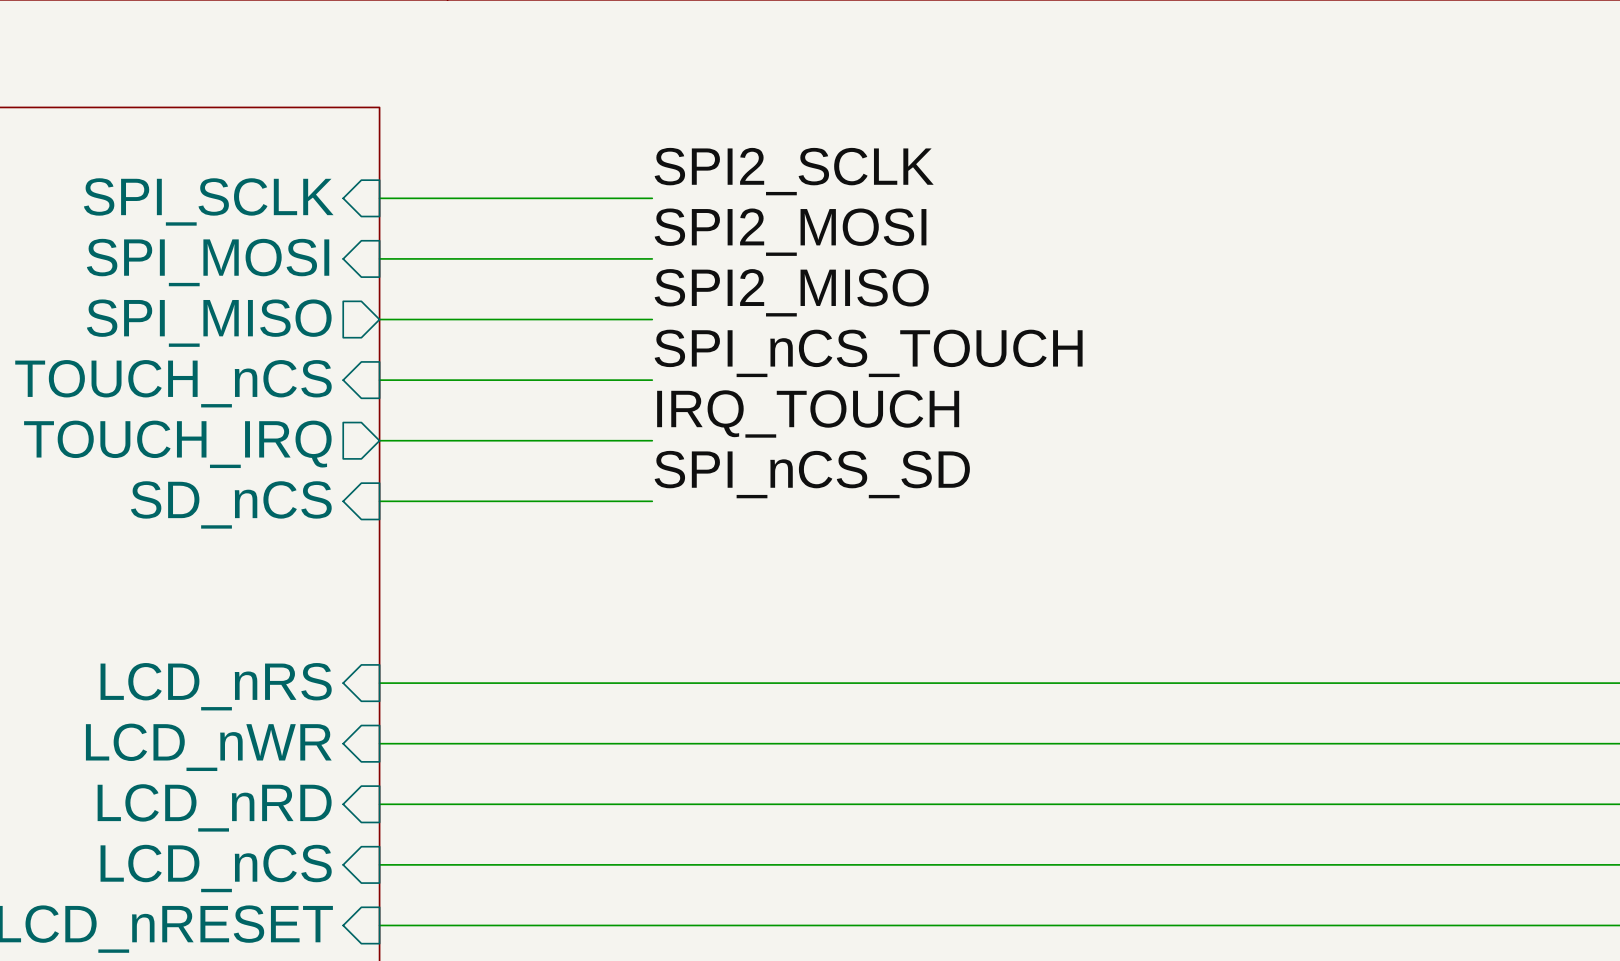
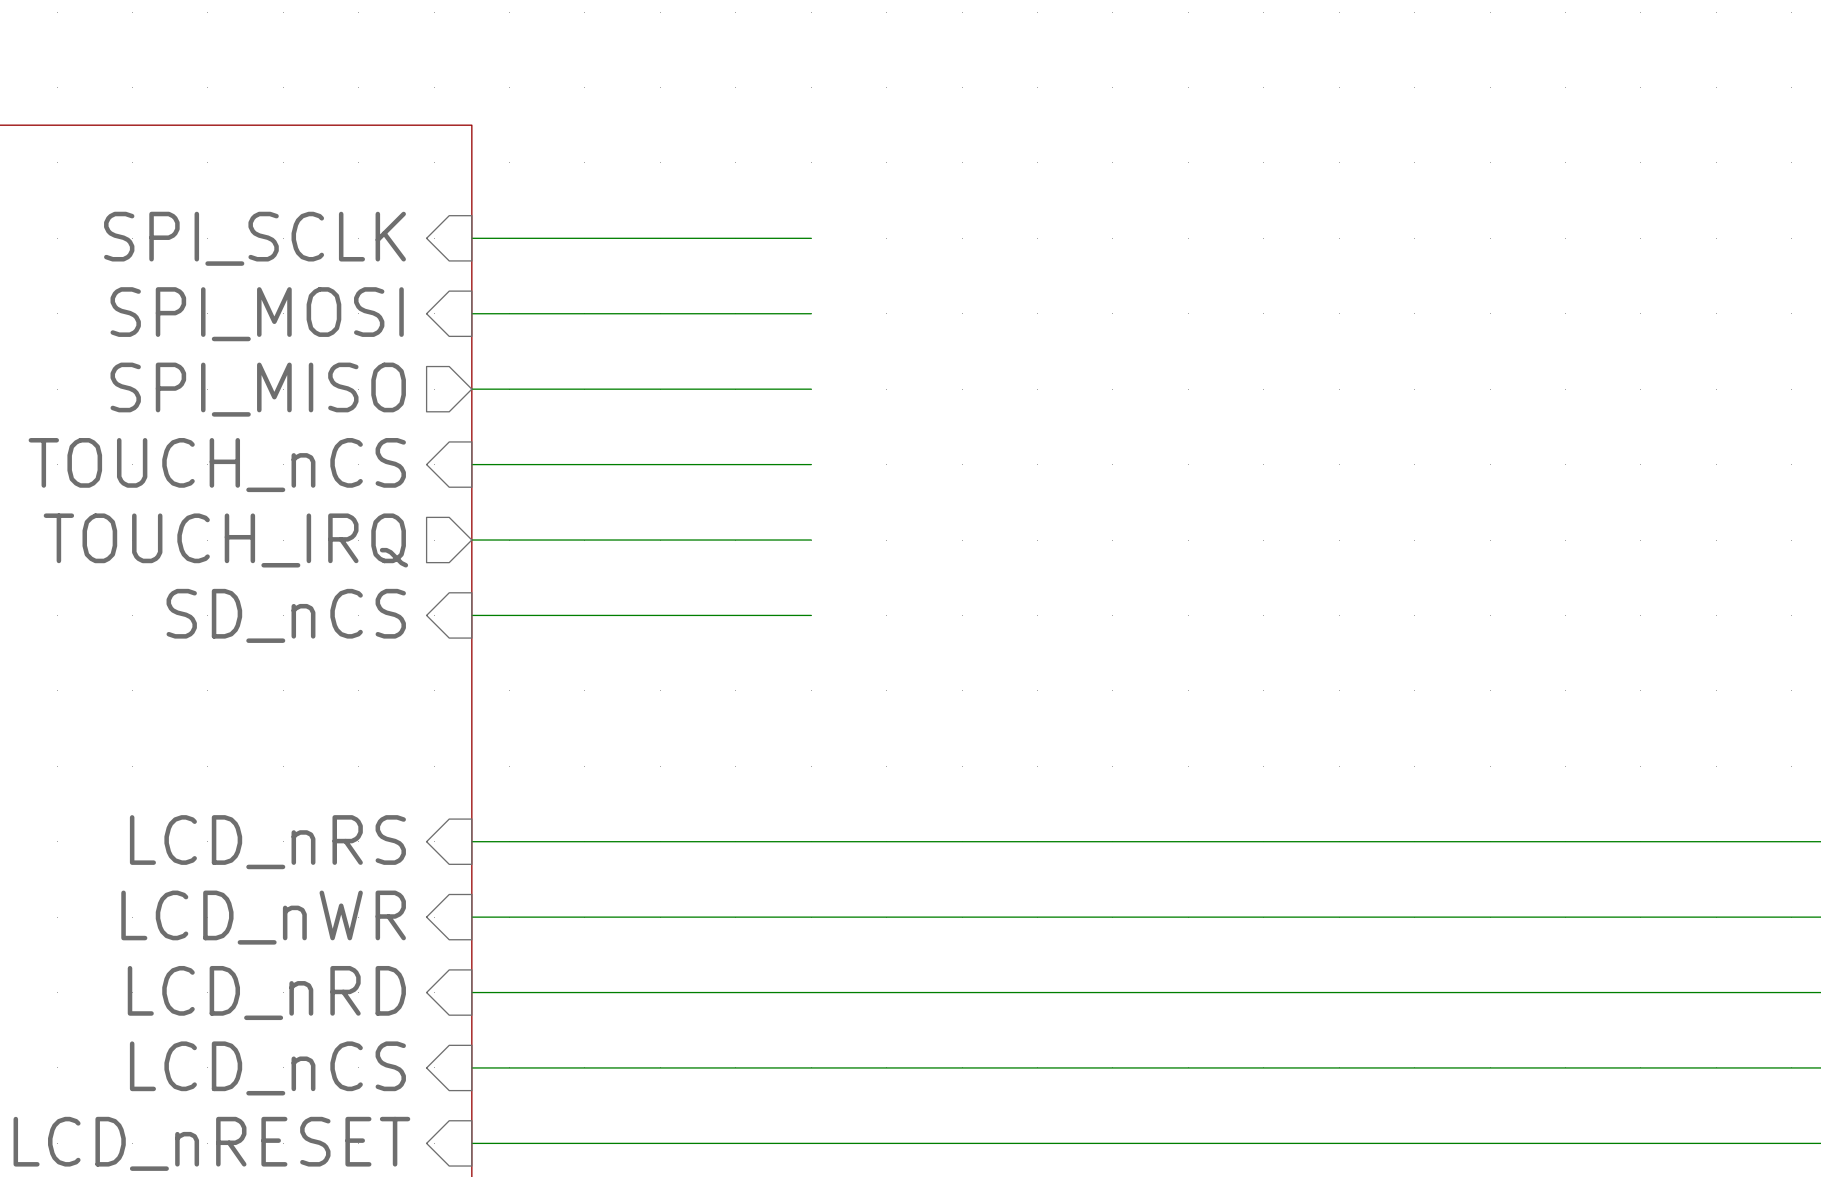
label: SPI2_SCLK (794, 171) -> none
label: SPI2_MOSI (790, 232) -> none
label: SPI2_MISO (791, 292) -> none
label: SPI_nCS_TOUCH (868, 353) -> none
label: IRQ_TOUCH (808, 413) -> none
label: SPI_nCS_SD (812, 474) -> none

